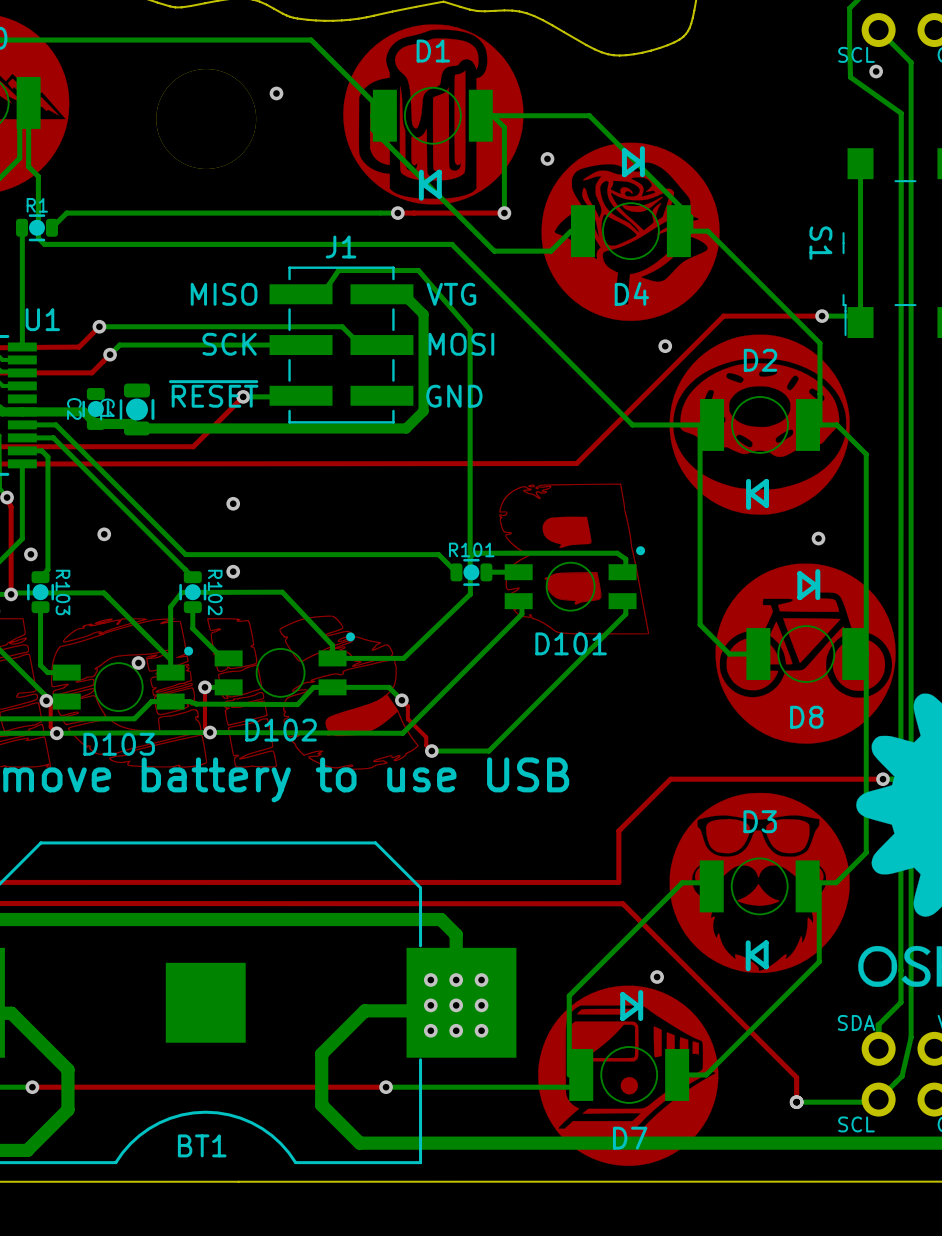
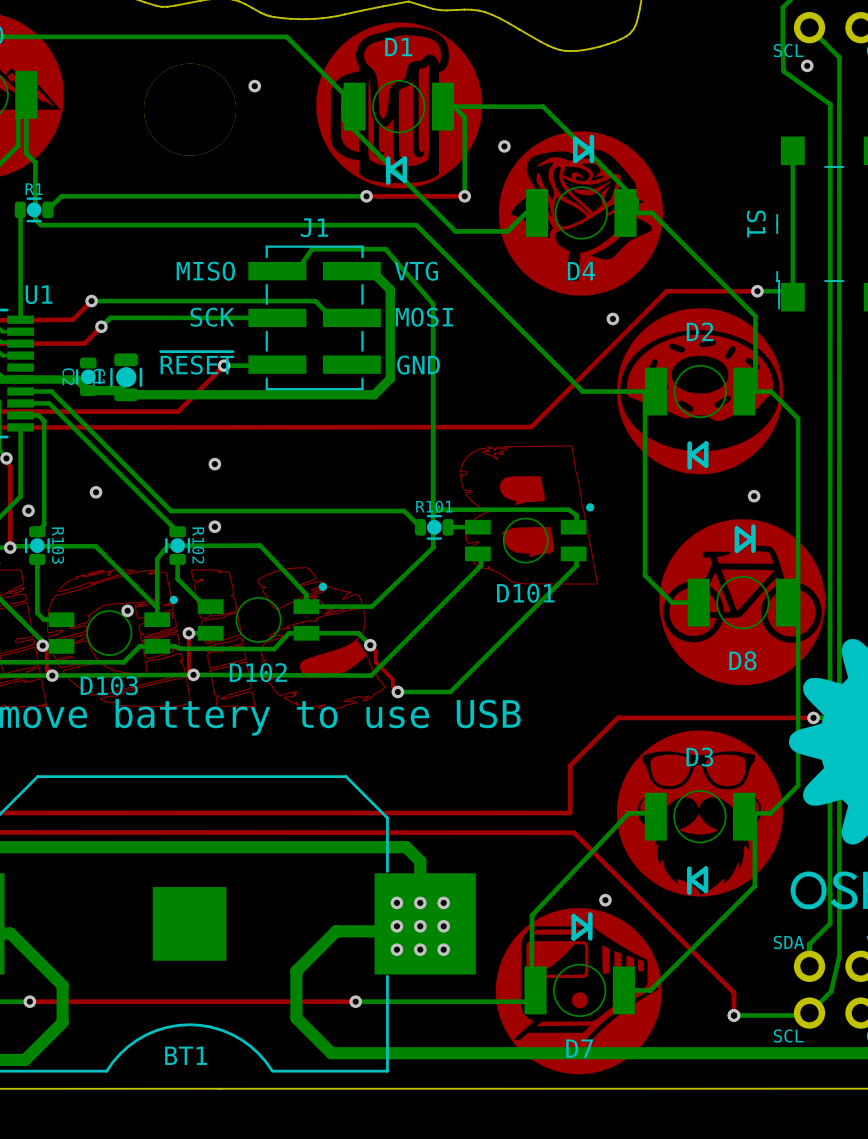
bottom track: (699, 882) (682, 882) (569, 995) (569, 1074) -> none
bottom track: none -> (654, 813) (628, 813) (532, 915) (531, 988)

